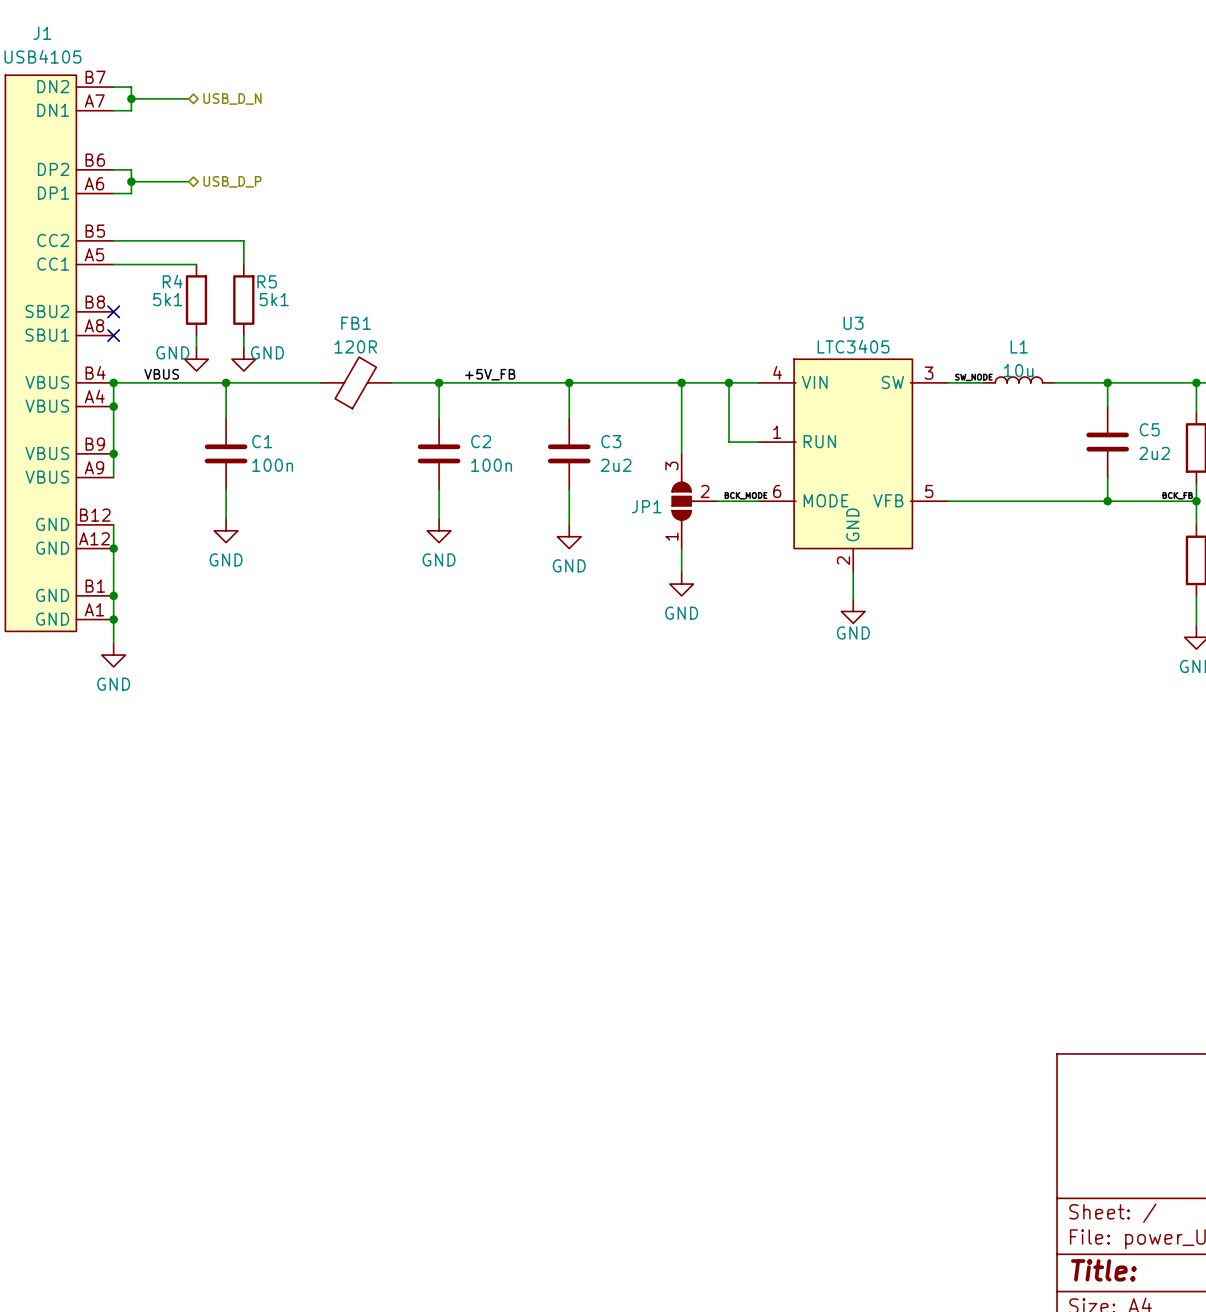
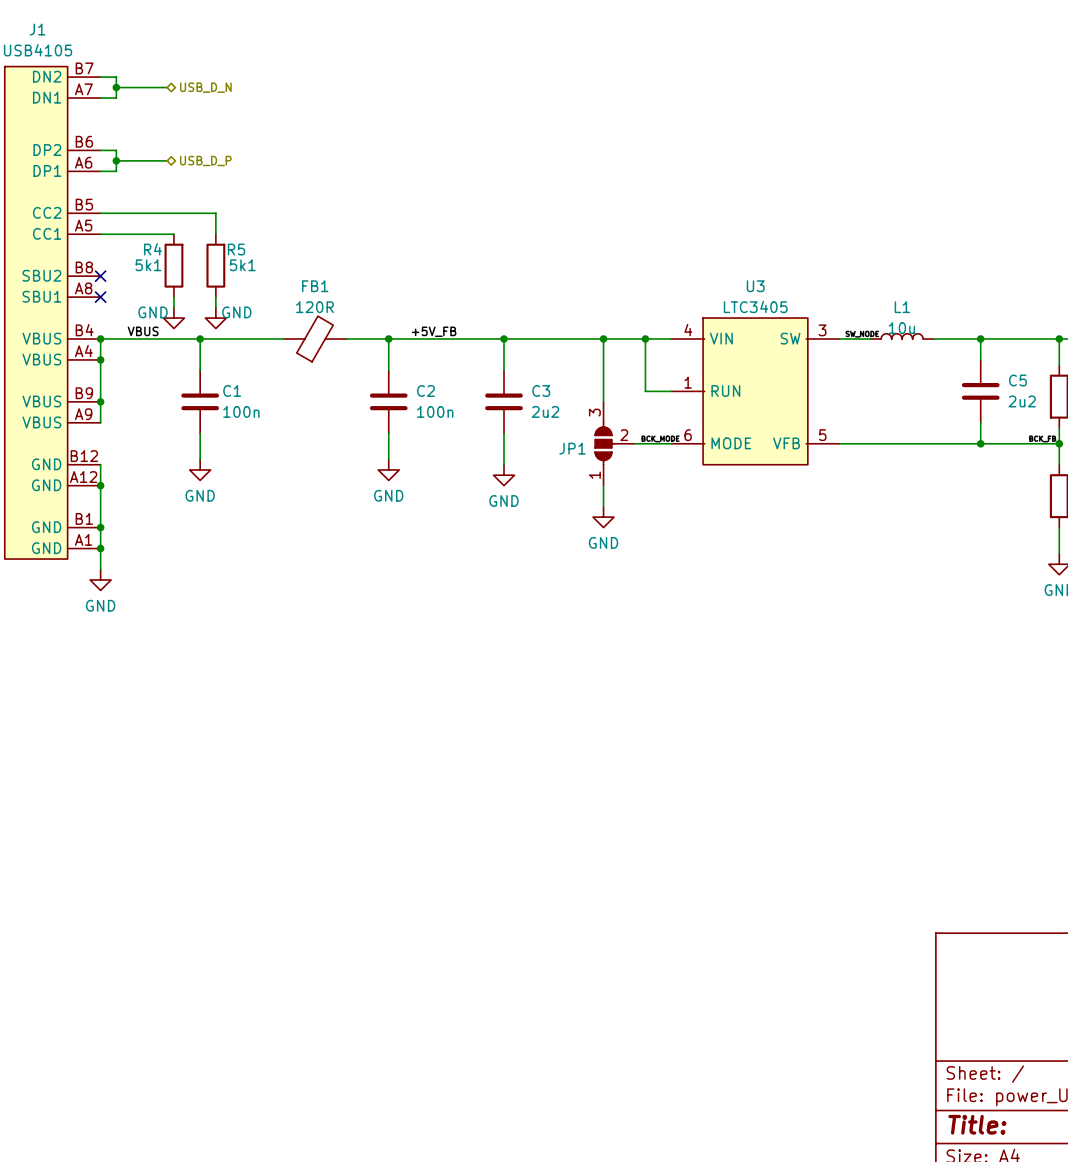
U3 symbol: [758, 359, 948, 573] -> [671, 318, 840, 465]
wire: (853, 572) (853, 599) -> none
power symbol: GND (853, 611) -> none

